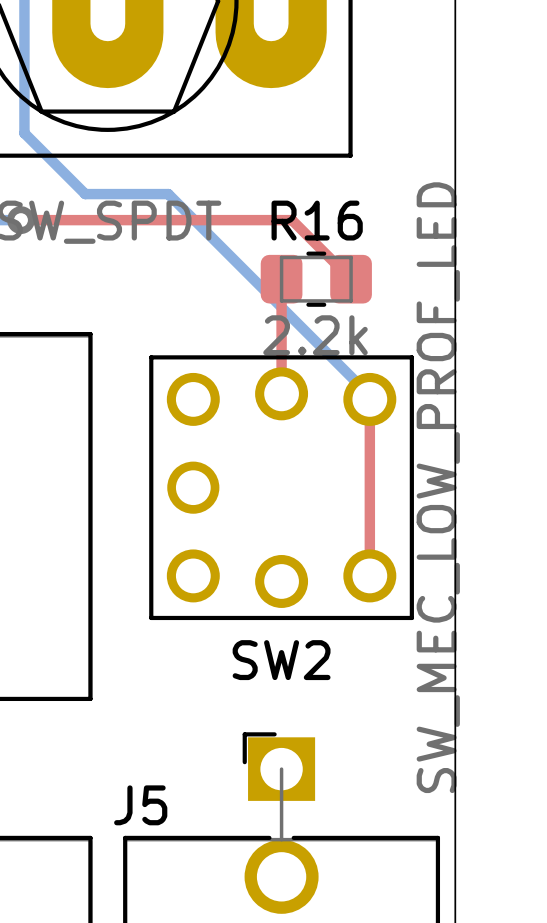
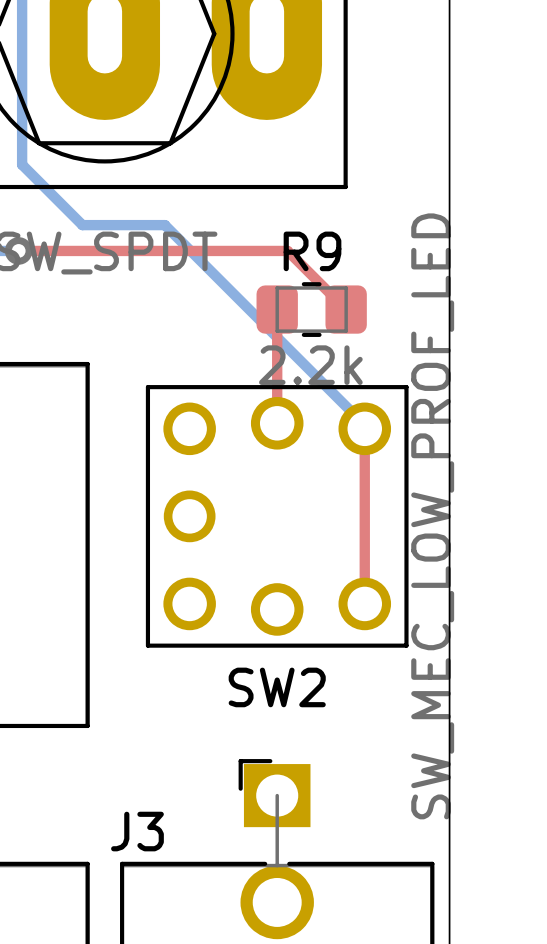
R16 name: R16 (317, 220) -> R9 (312, 251)
J5 name: J5 (140, 805) -> J3 (137, 831)

